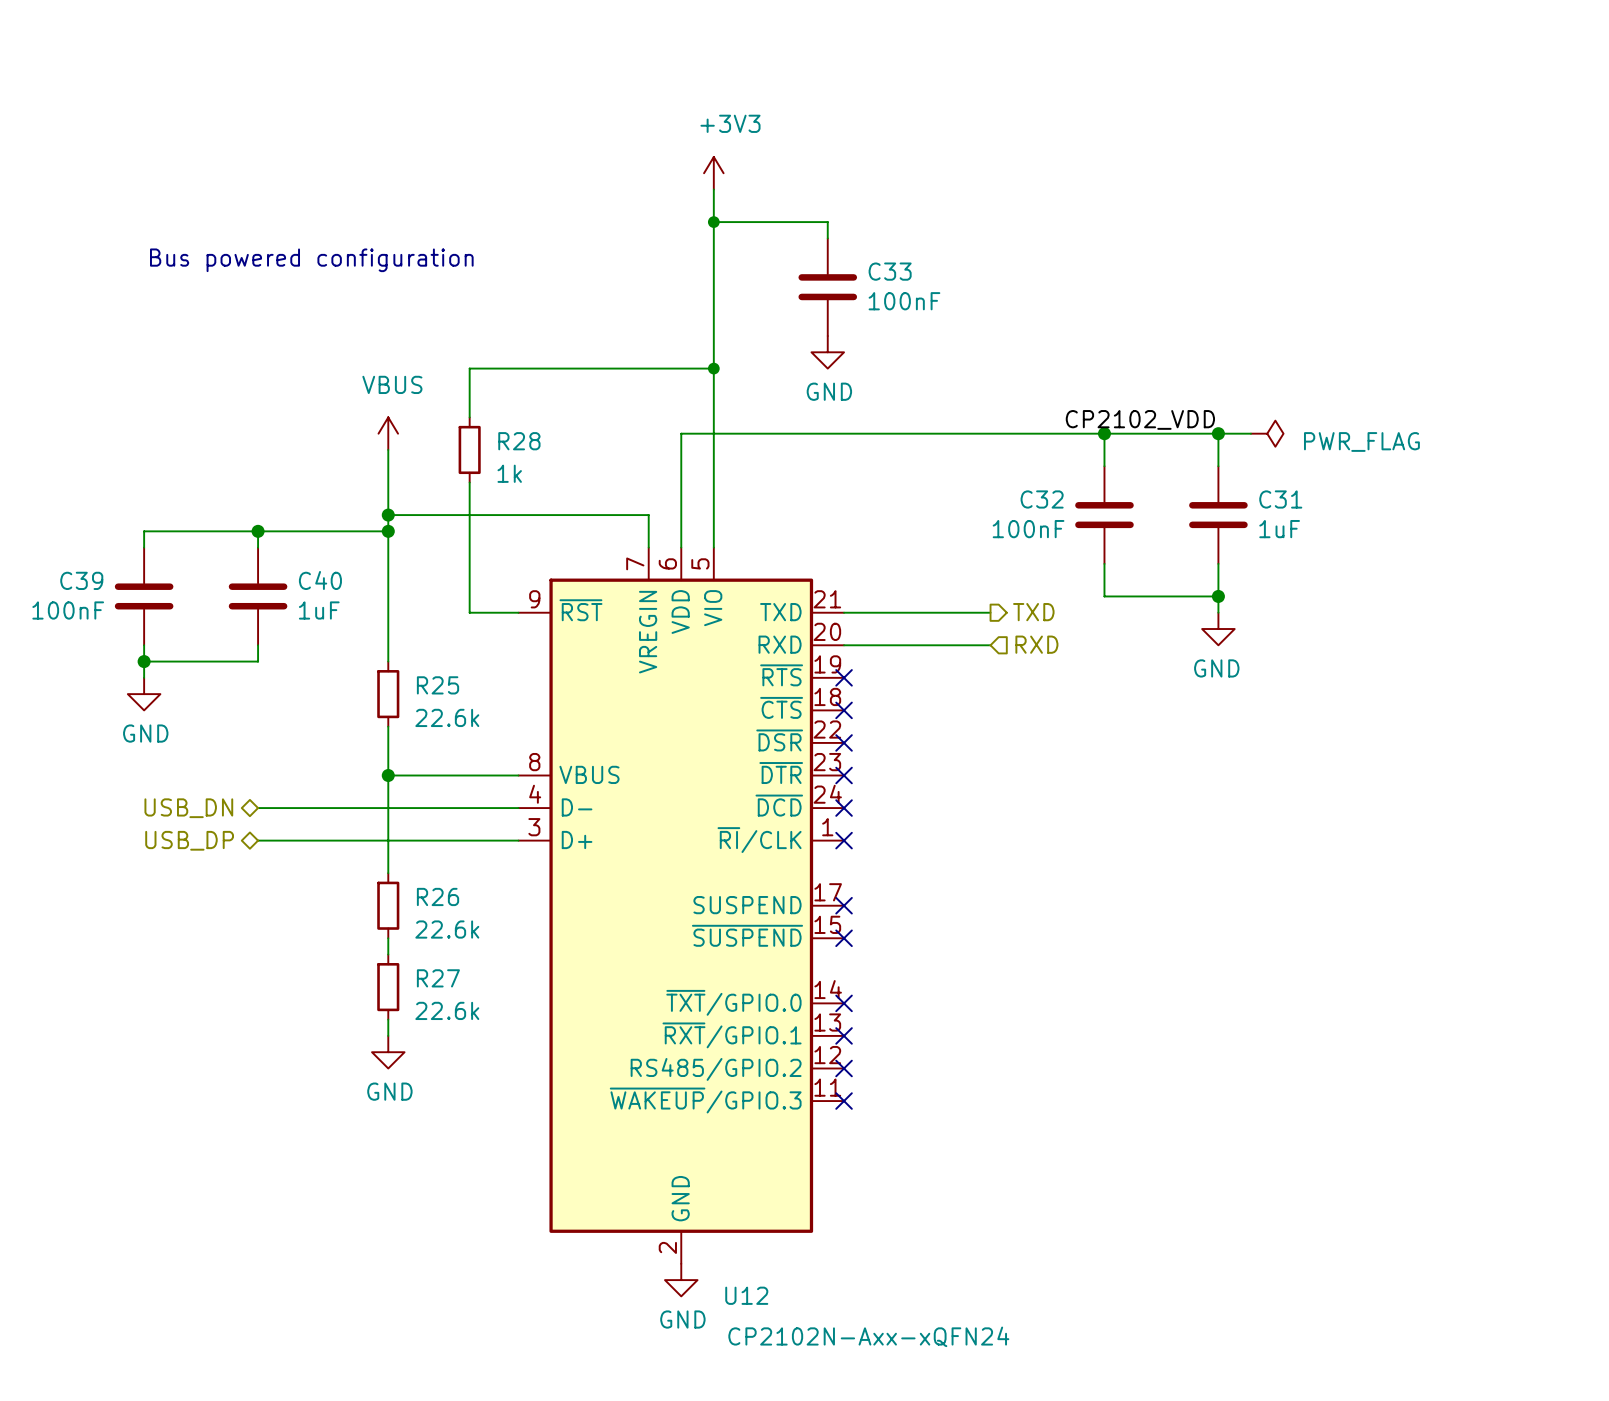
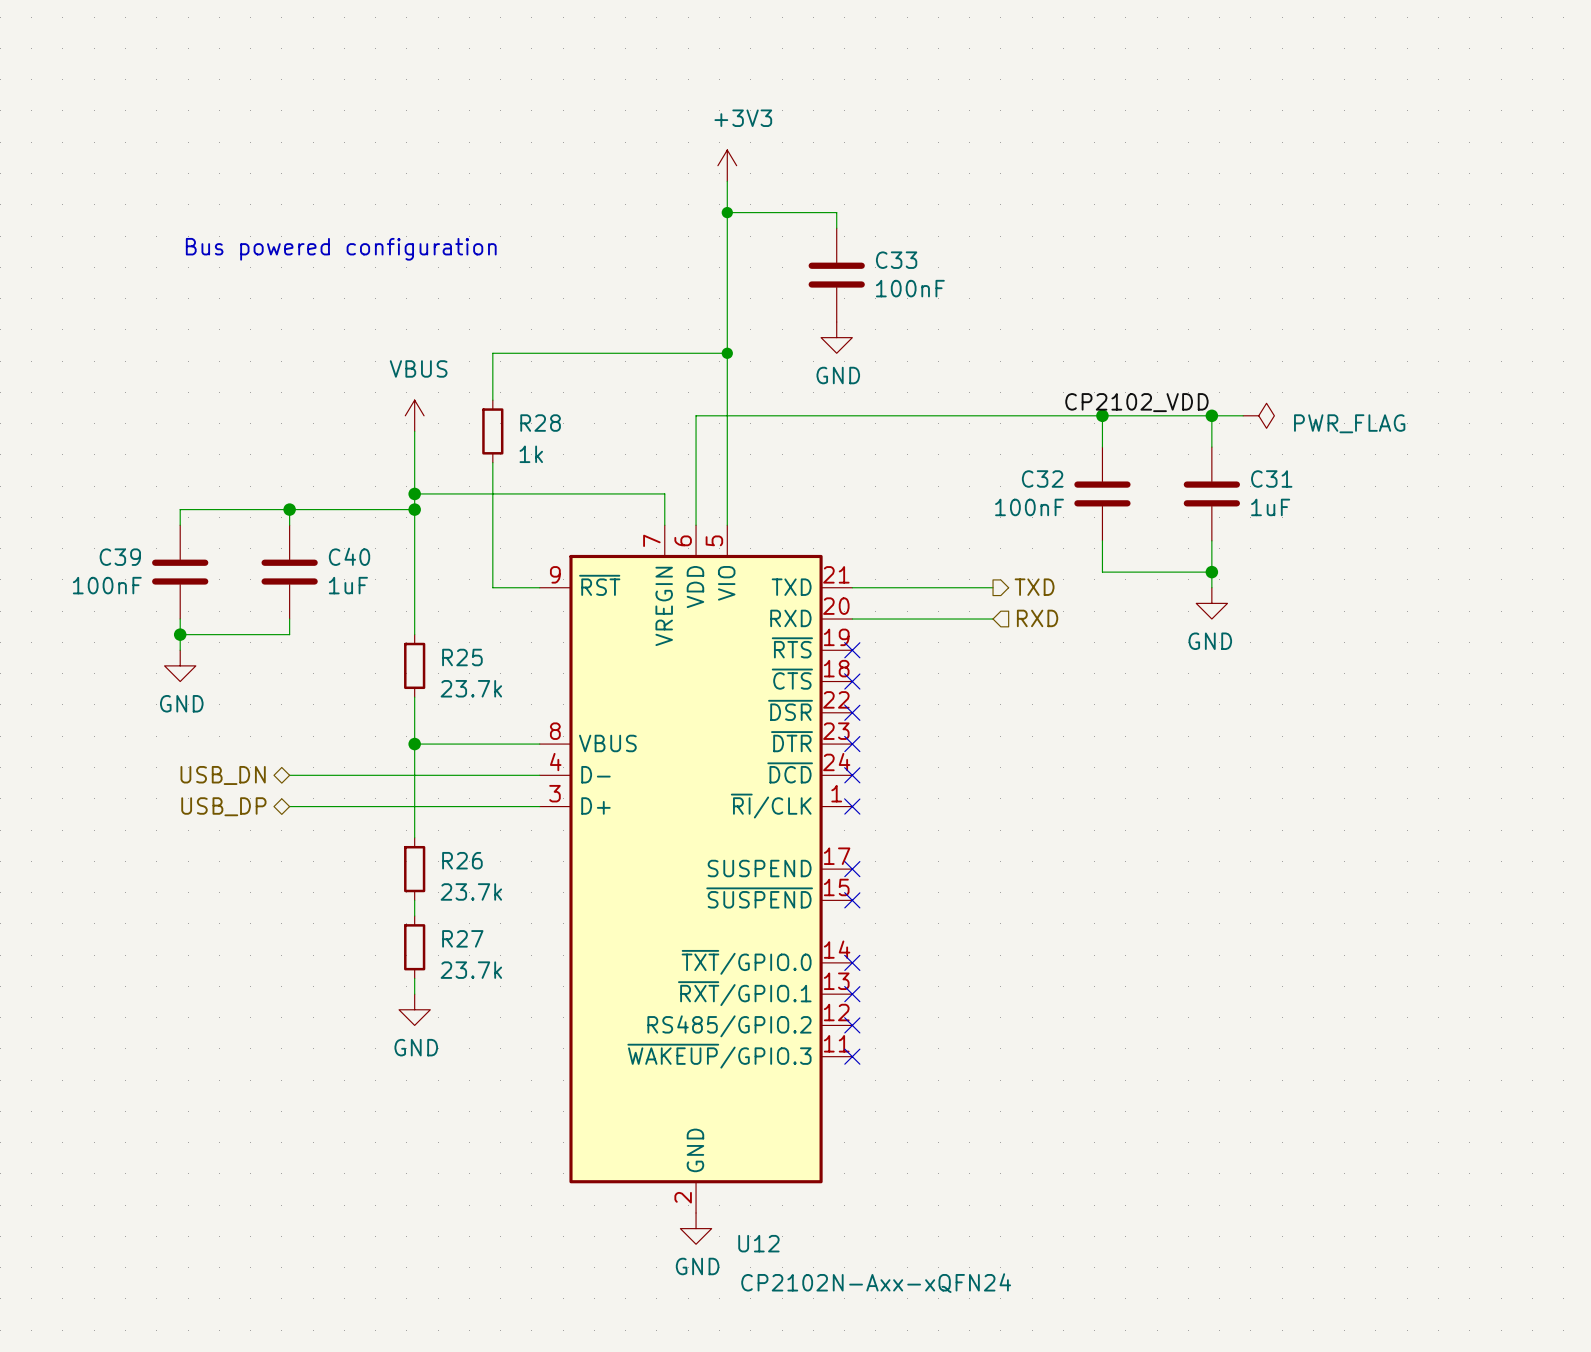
R25 value: 22.6k (447, 717) -> 23.7k (471, 688)
R26 value: 22.6k (447, 929) -> 23.7k (471, 891)
R27 value: 22.6k (447, 1010) -> 23.7k (471, 970)

